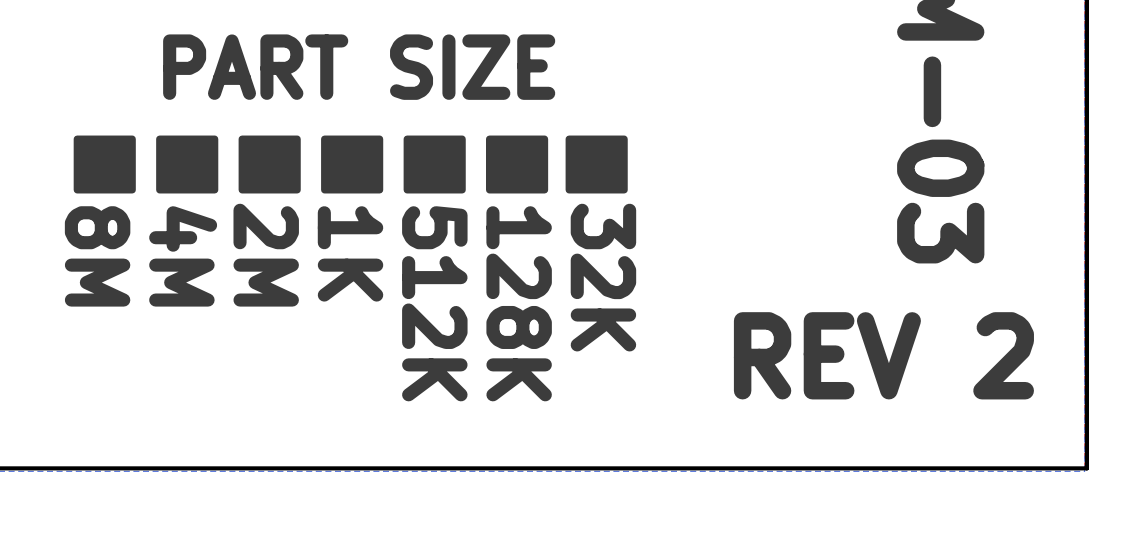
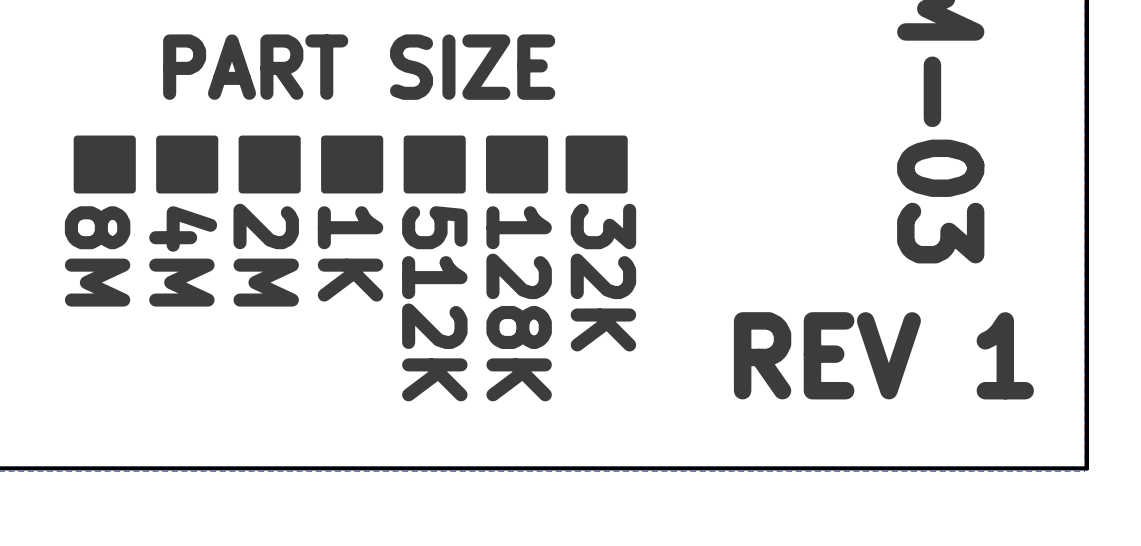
text: REV 2 (883, 355) -> REV 1 (883, 355)

